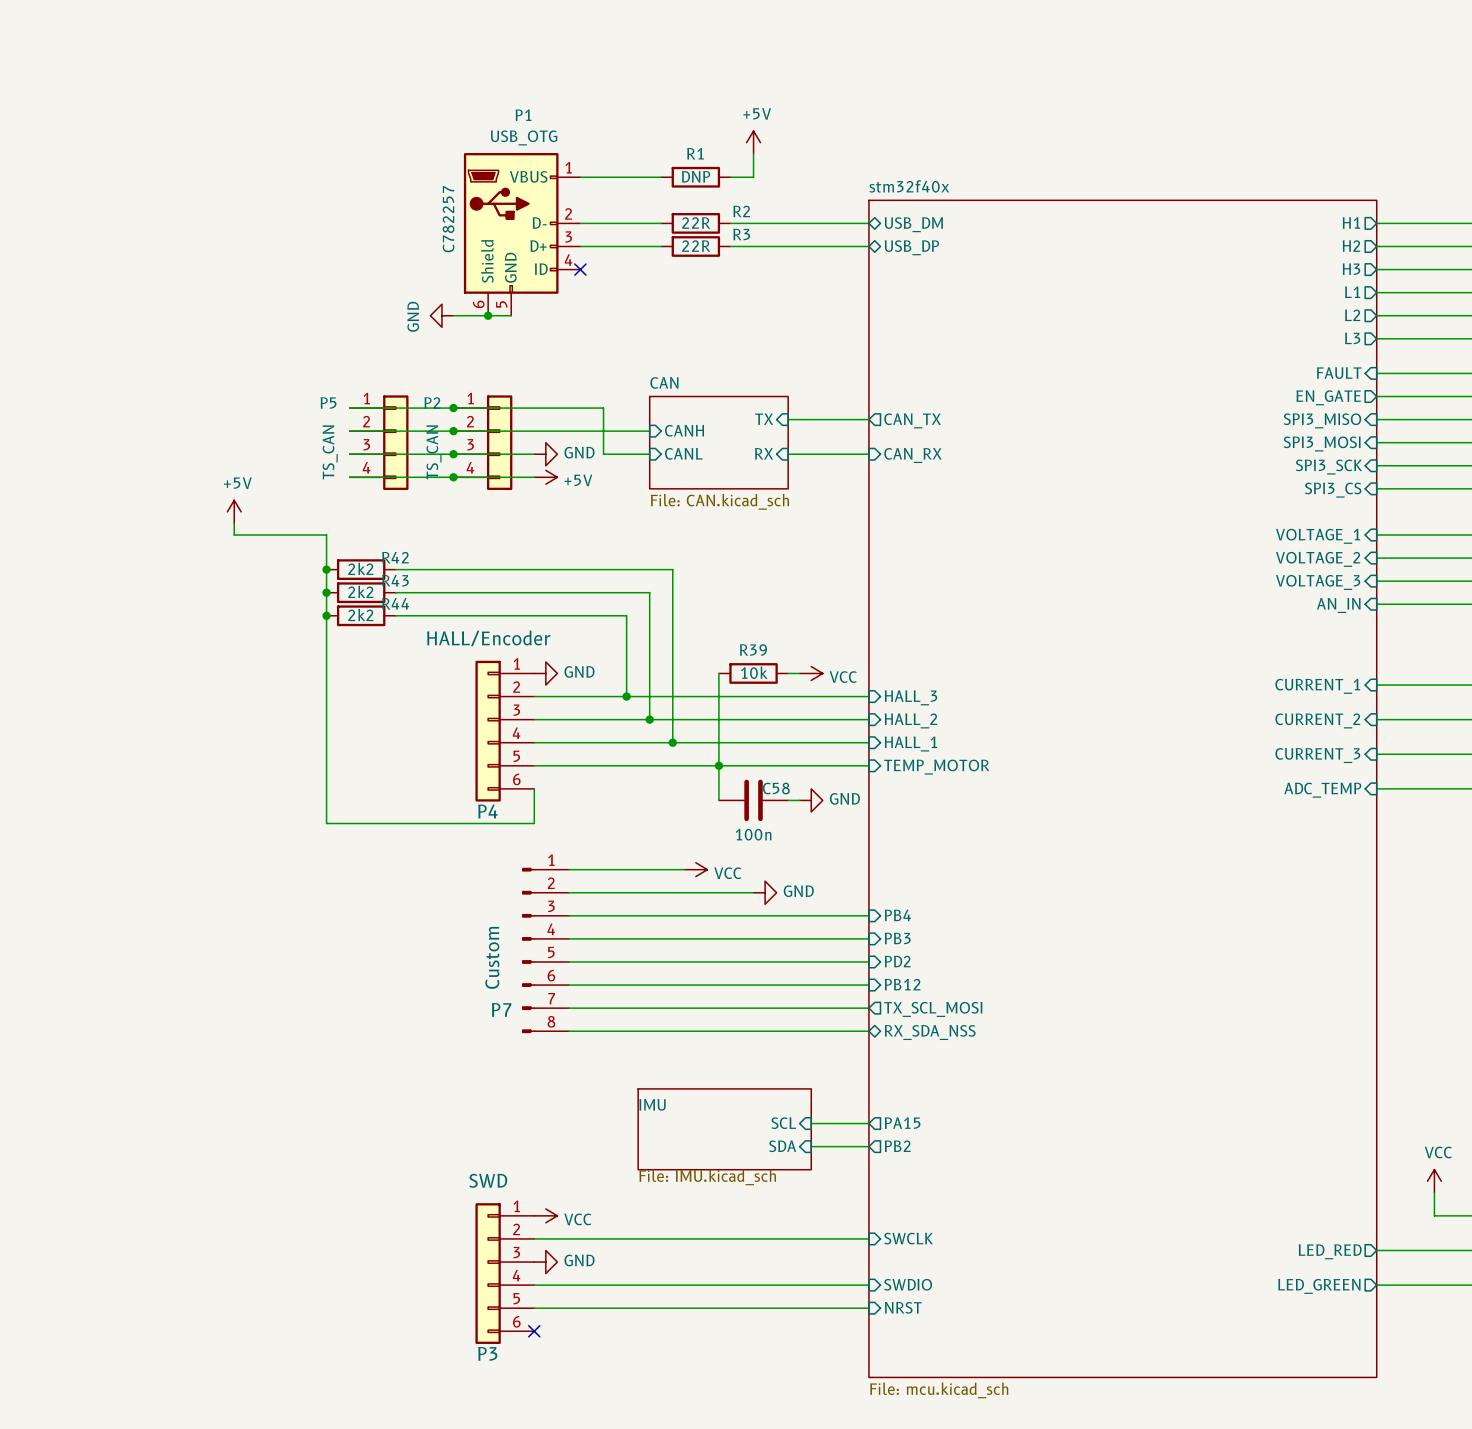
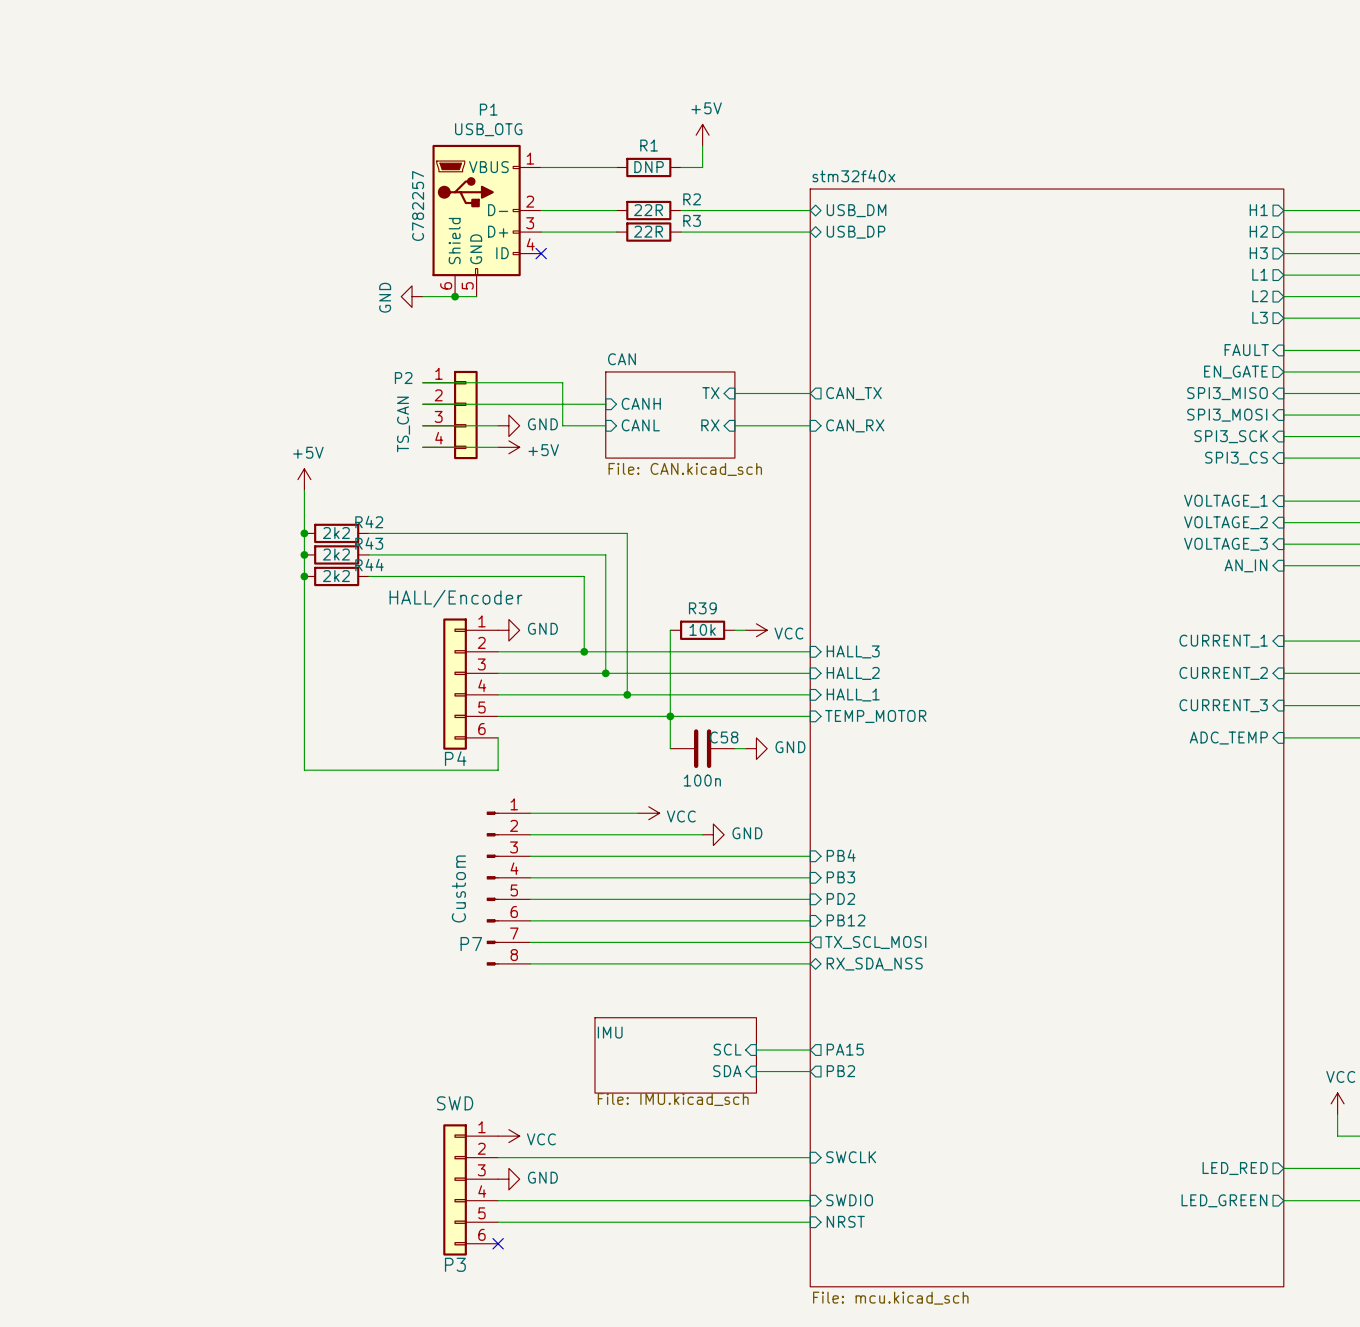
wire: (349, 408) (453, 408) -> none
junction: (453, 408) -> none
wire: (349, 431) (453, 431) -> none
junction: (453, 431) -> none
P5: TS_CAN (379, 442) -> none
wire: (349, 454) (453, 454) -> none
junction: (453, 454) -> none
wire: (349, 477) (453, 477) -> none
junction: (453, 477) -> none
power symbol position: +5V (234, 511) -> +5V (304, 479)
wire: (234, 523) (234, 535) (326, 535) -> (304, 490) (304, 501)

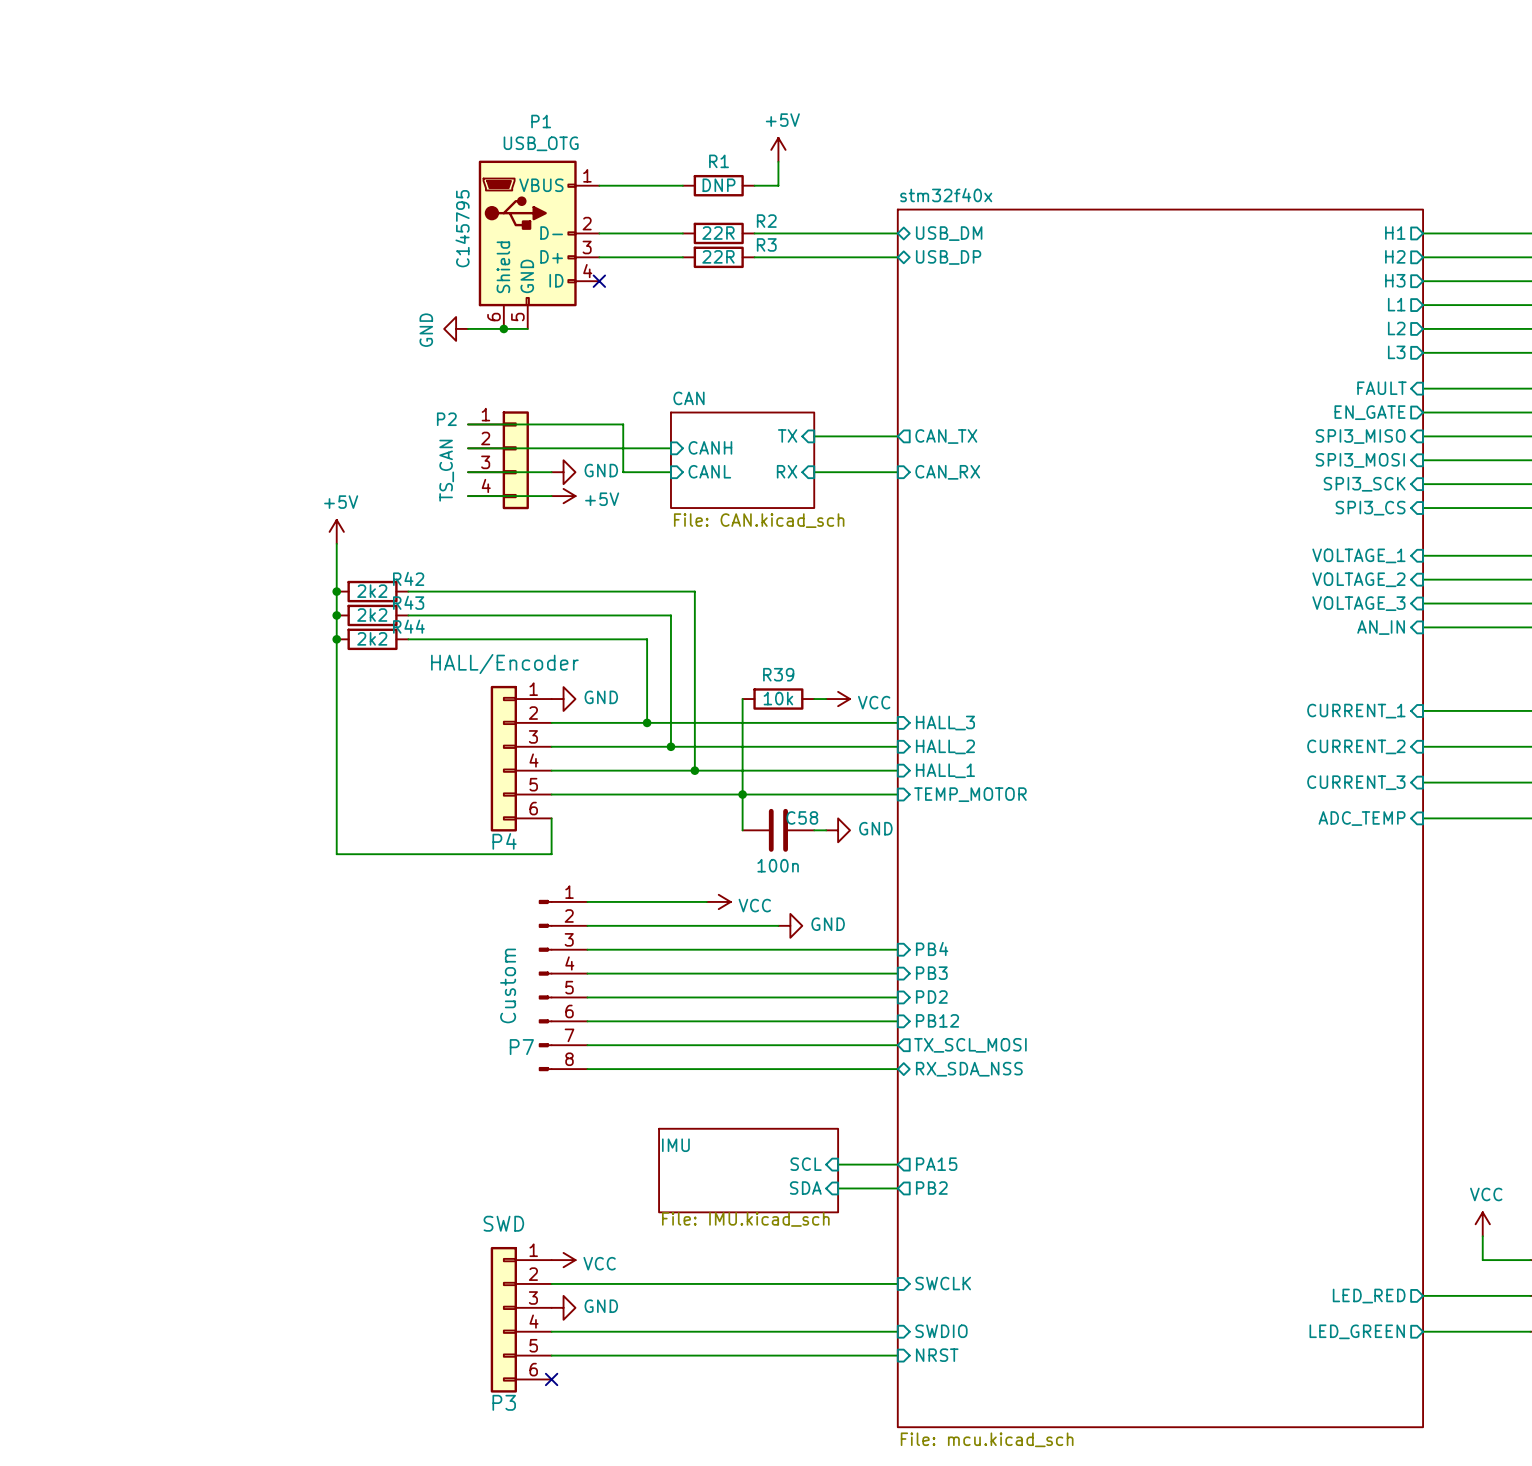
P1 text: C782257 (418, 205) -> C145795 (462, 228)

